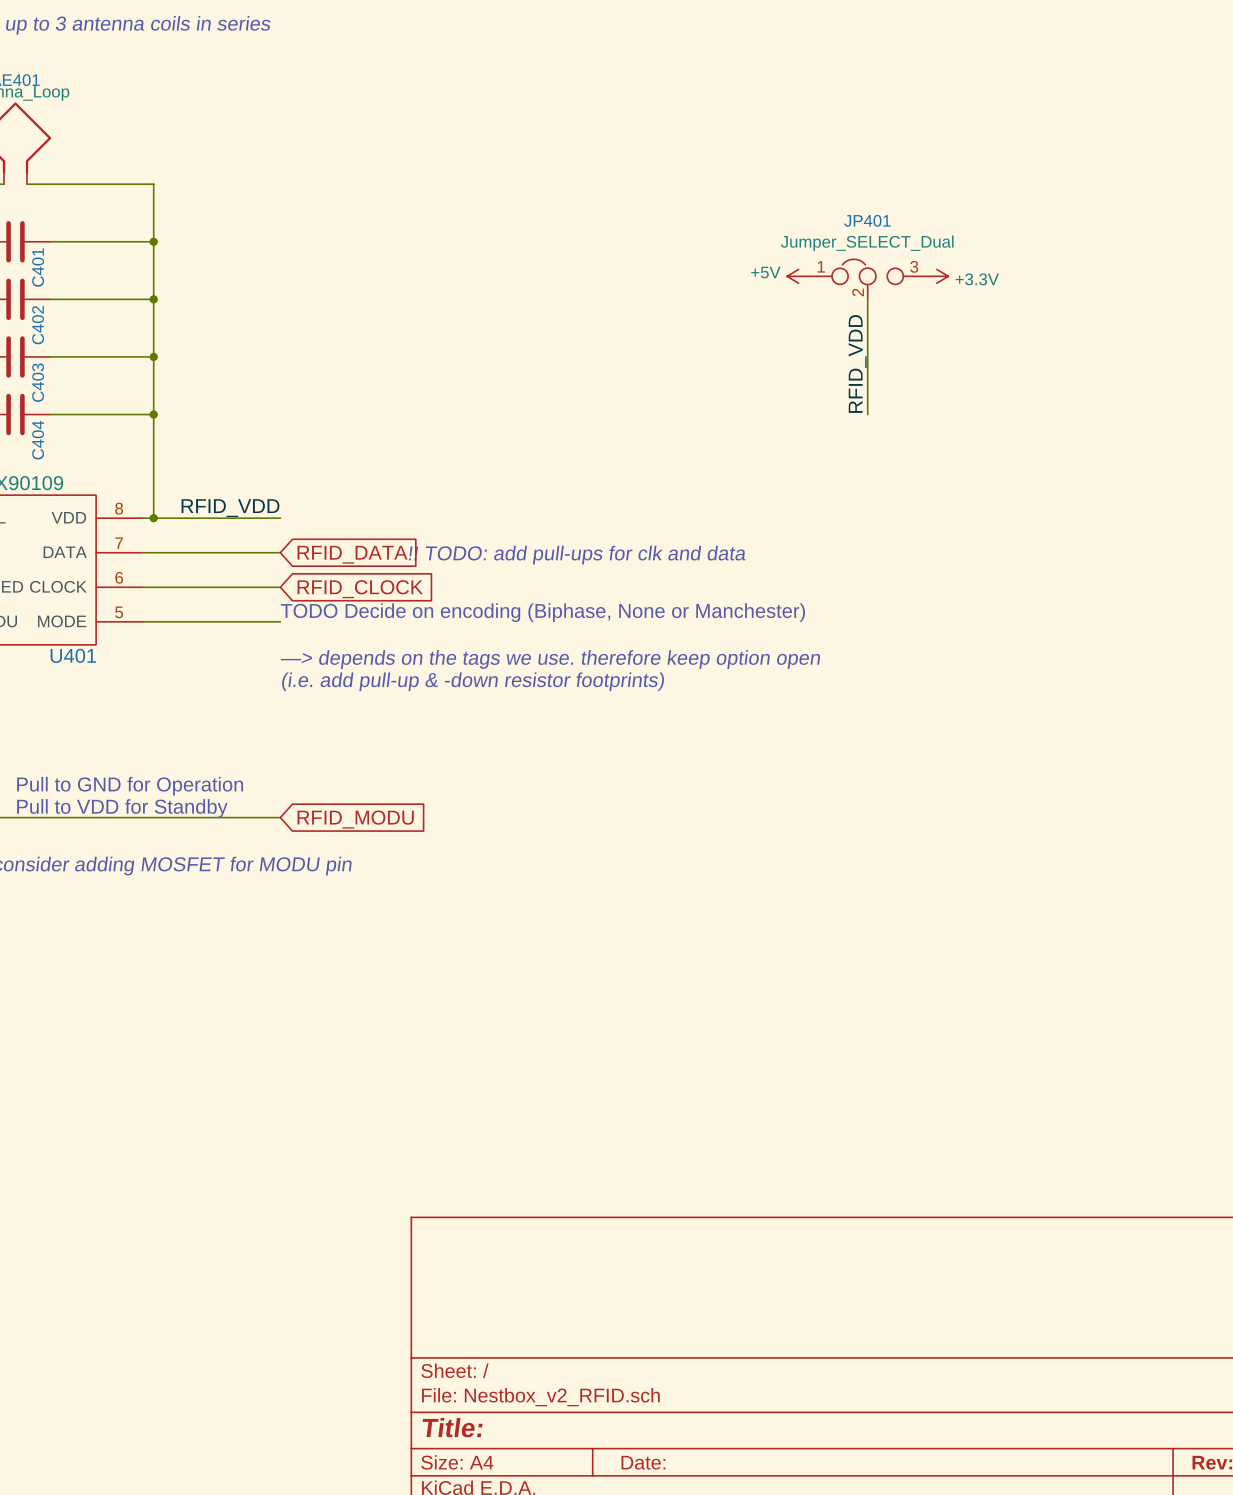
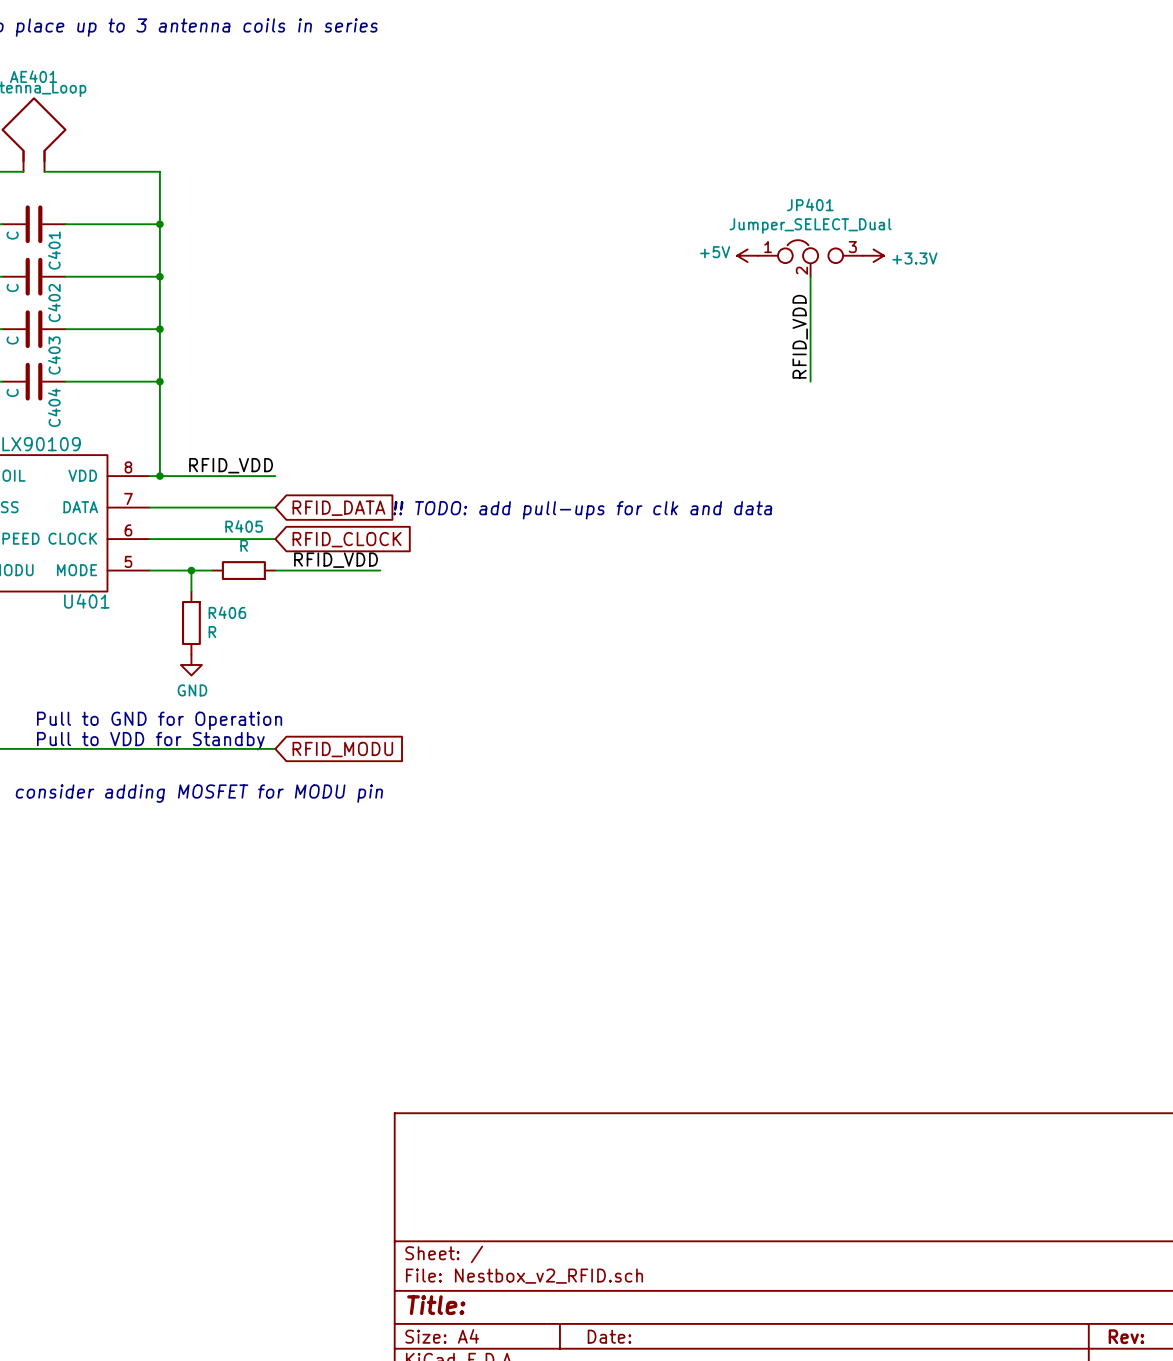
label: none -> RFID_VDD (336, 560)
text: TODO Decide on encoding (Biphase, None or Manchester) (542, 612) -> none
wire: none -> (191, 570) (191, 591)
junction: none -> (191, 570)
wire: (211, 621) (280, 621) -> (380, 570) (275, 570)
R405: none -> R (243, 570)
text: —> depends on the tags we use. therefore keep option open (550, 659) -> none
R406: none -> R (191, 623)
text: (i.e. add pull-up & -down resistor footprints) (473, 681) -> none
power symbol: none -> GND (191, 664)

